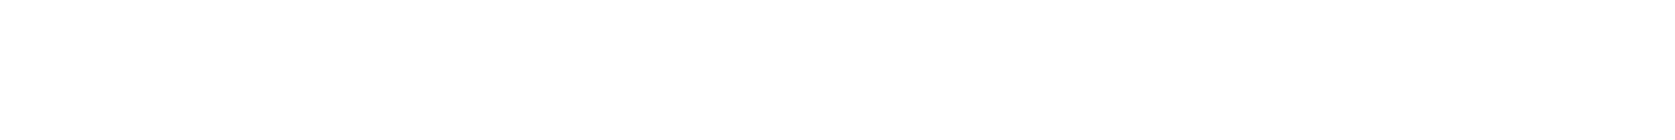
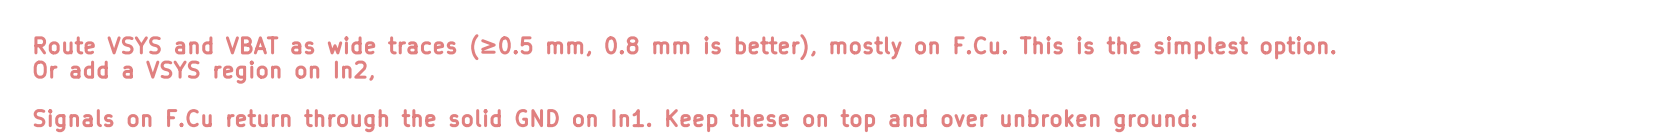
text: none -> Route VSYS and VBAT as wide traces (≥0.5 mm, 0.8 mm is better), mostly on F.Cu. This is the simplest option. (684, 47)
text: none -> Or add a VSYS region on In2, (203, 72)
text: none -> Signals on F.Cu return through the solid GND on In1. Keep these on top and over unbroken ground: (615, 120)

